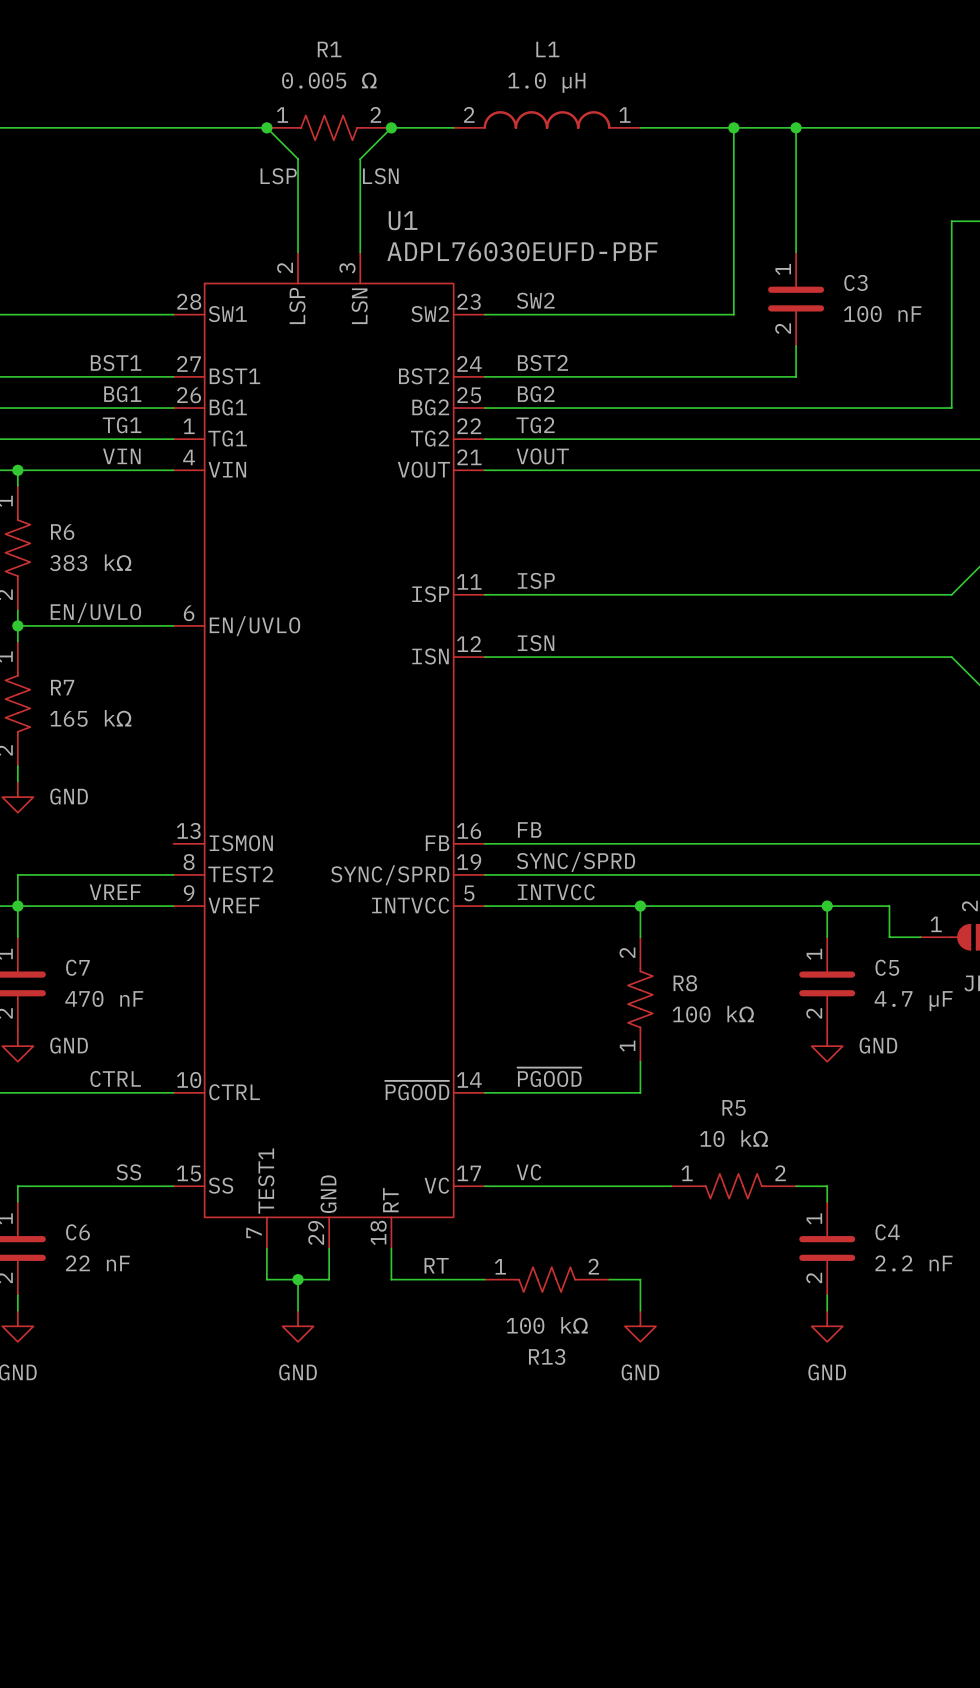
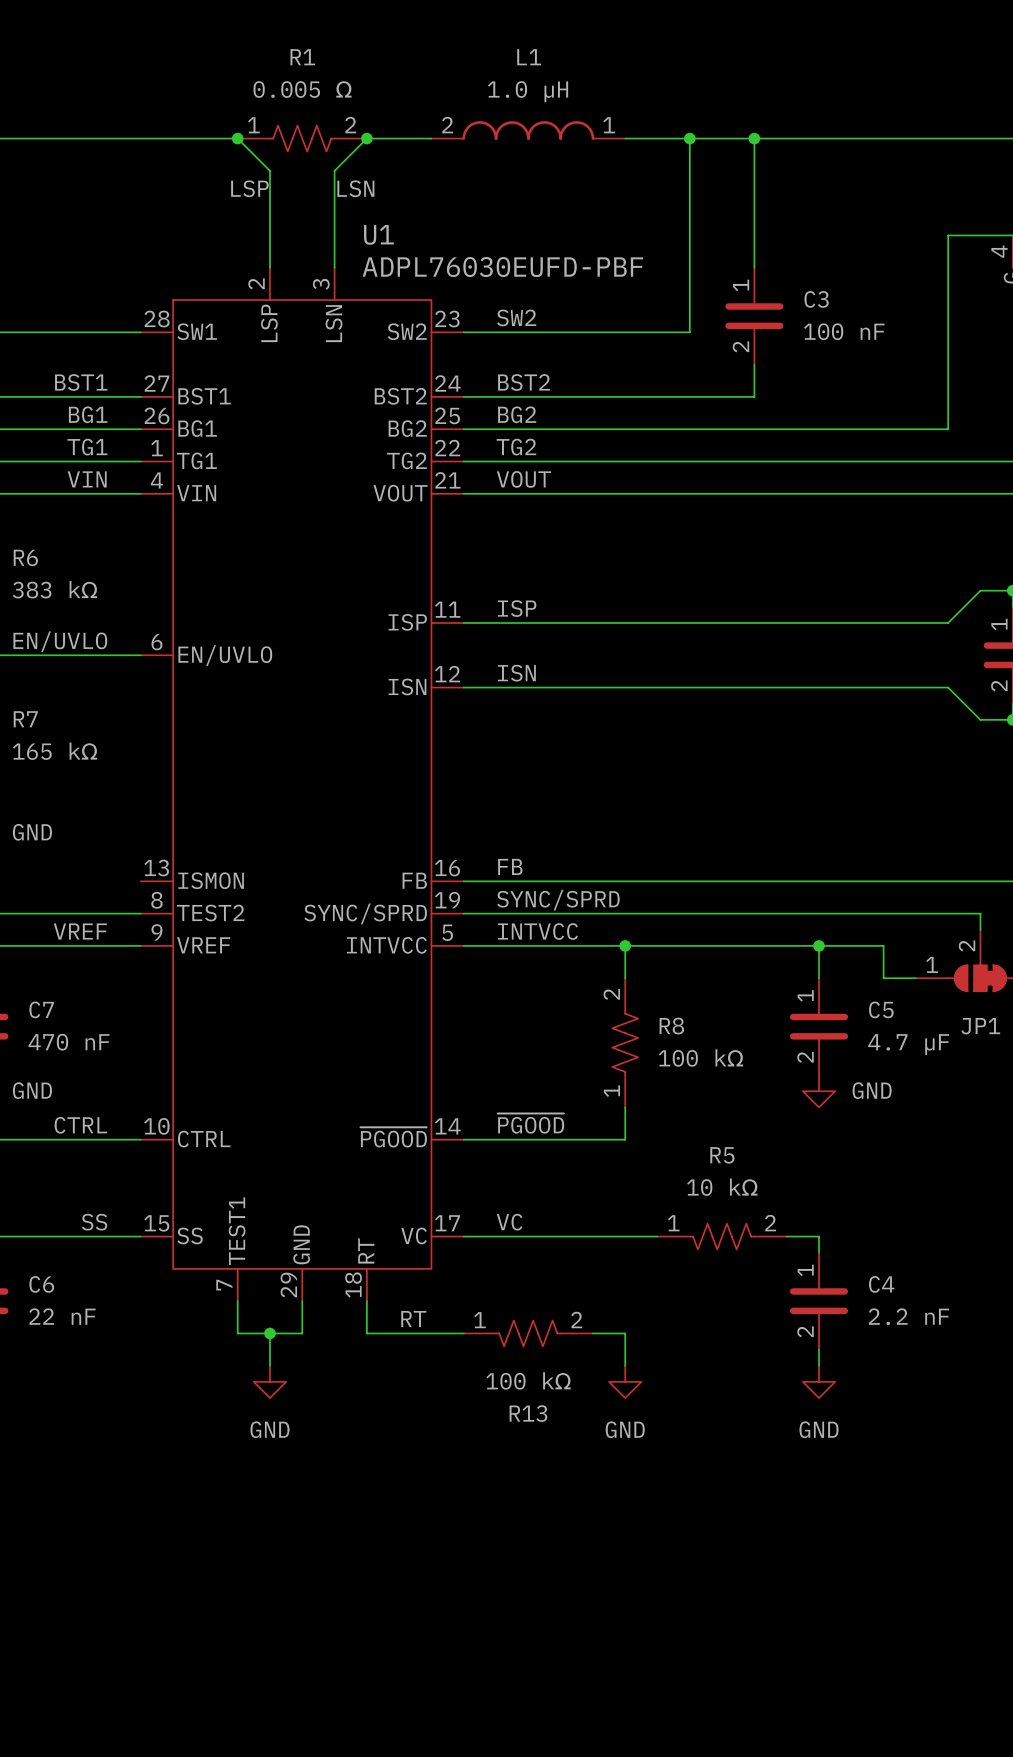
junction: none -> (689, 138)
wire: (733, 127) (733, 314) (702, 314) -> (689, 138) (689, 332)
junction: (733, 127) -> none
junction: none -> (754, 138)
wire: (796, 127) (796, 252) -> (754, 138) (754, 267)
junction: (796, 127) -> none
C3 position: (796, 299) -> (754, 316)
wire: (796, 345) (796, 376) (764, 376) -> (754, 364) (754, 396)

